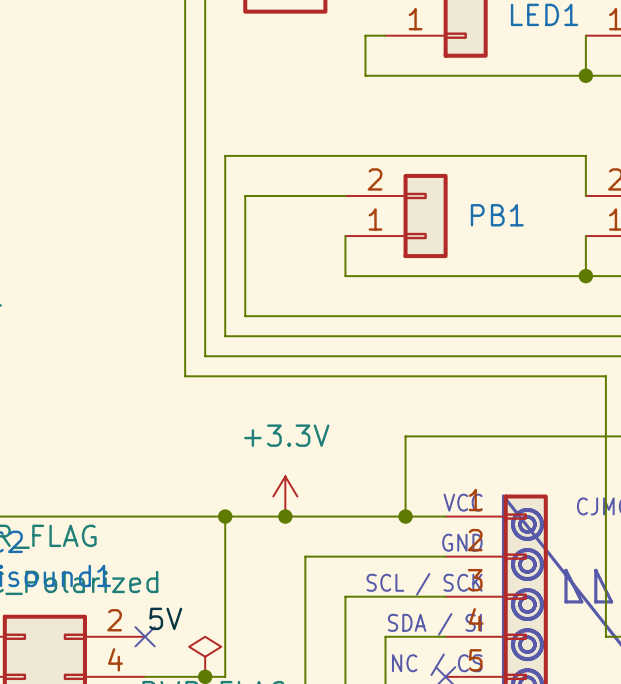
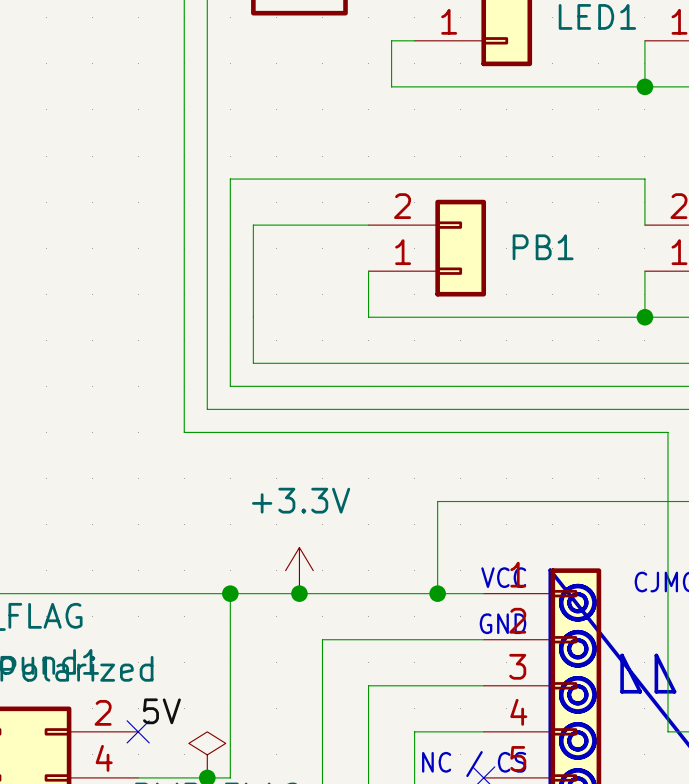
text: SCL / SCK (424, 584) -> none
text: SDA / SI (434, 624) -> none

